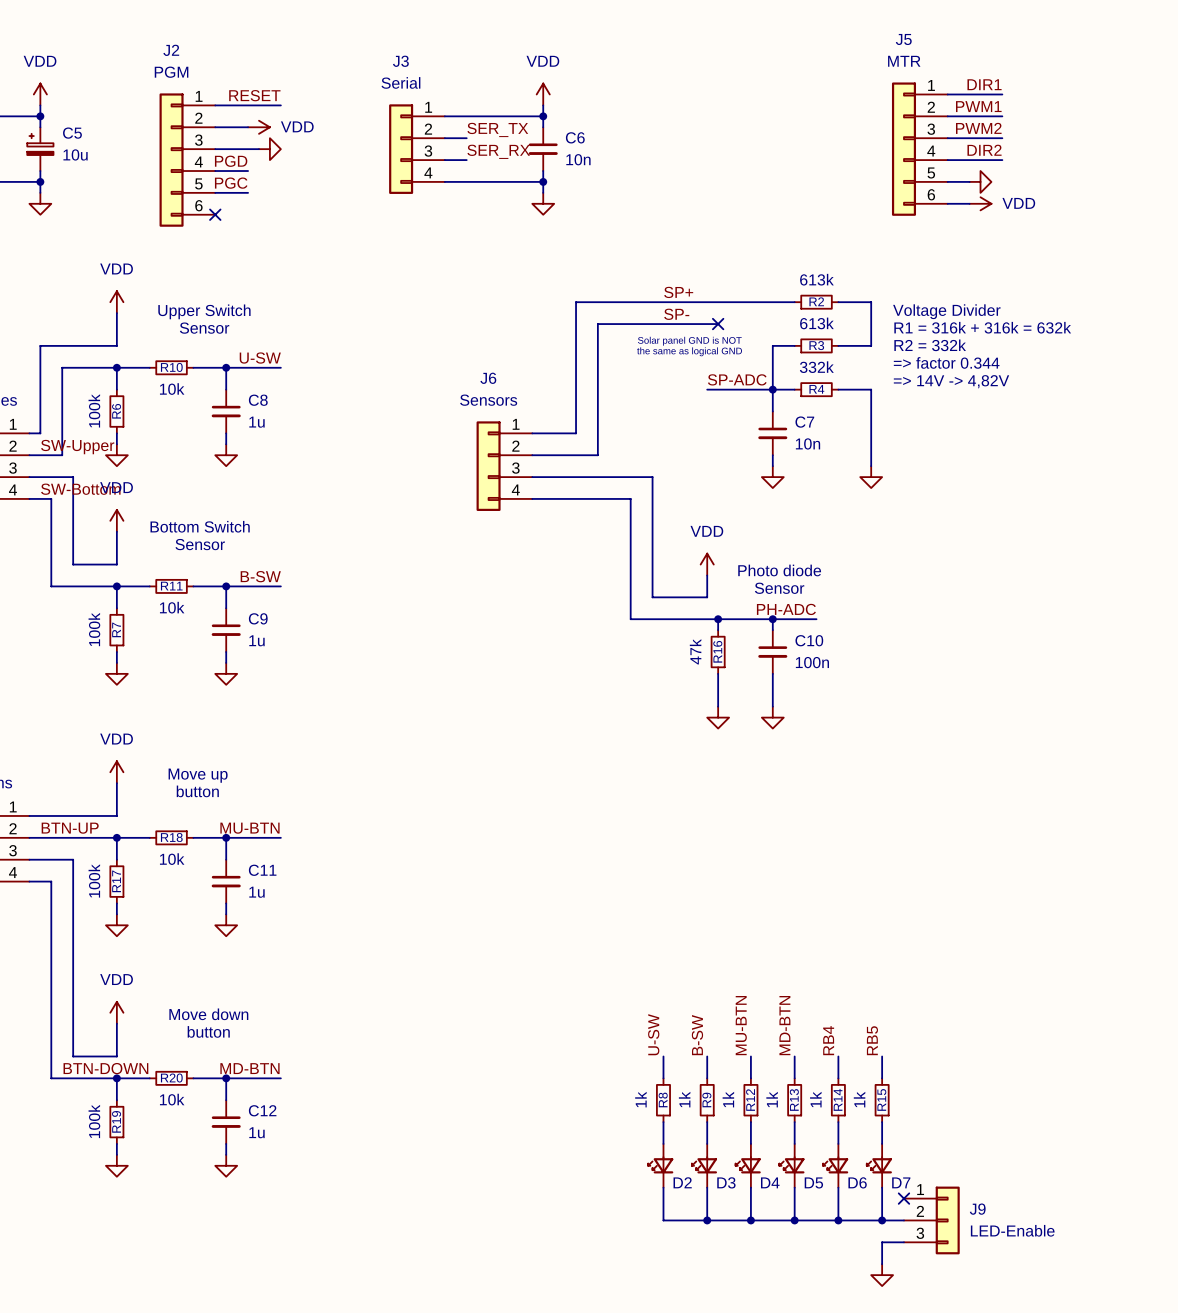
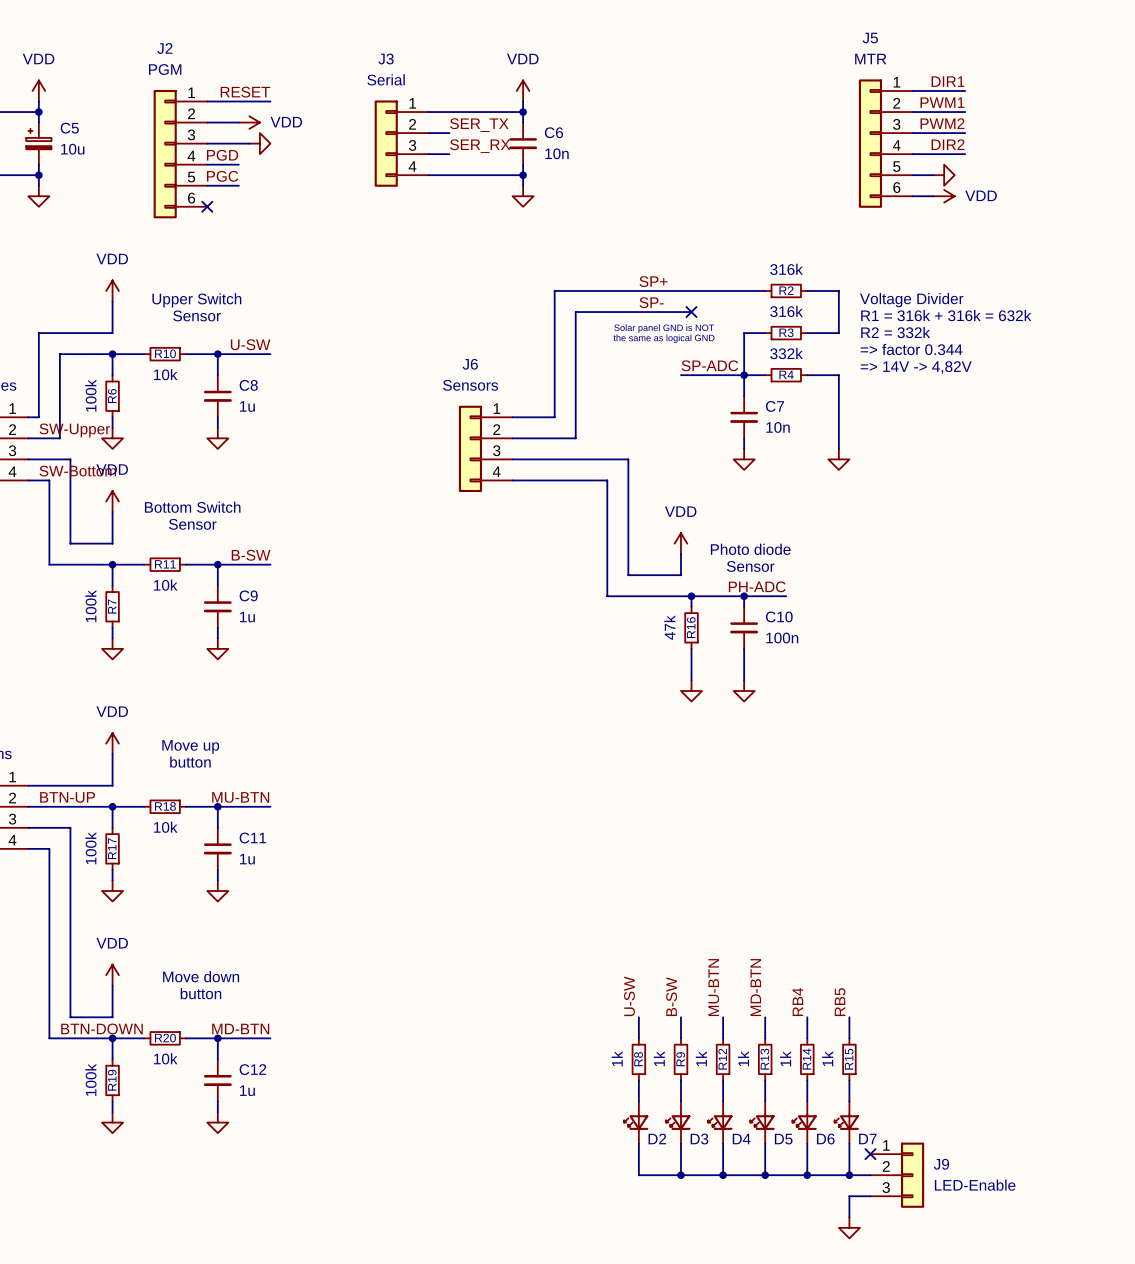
R2 value: 613k (816, 279) -> 316k (786, 269)
R3 value: 613k (816, 323) -> 316k (786, 311)

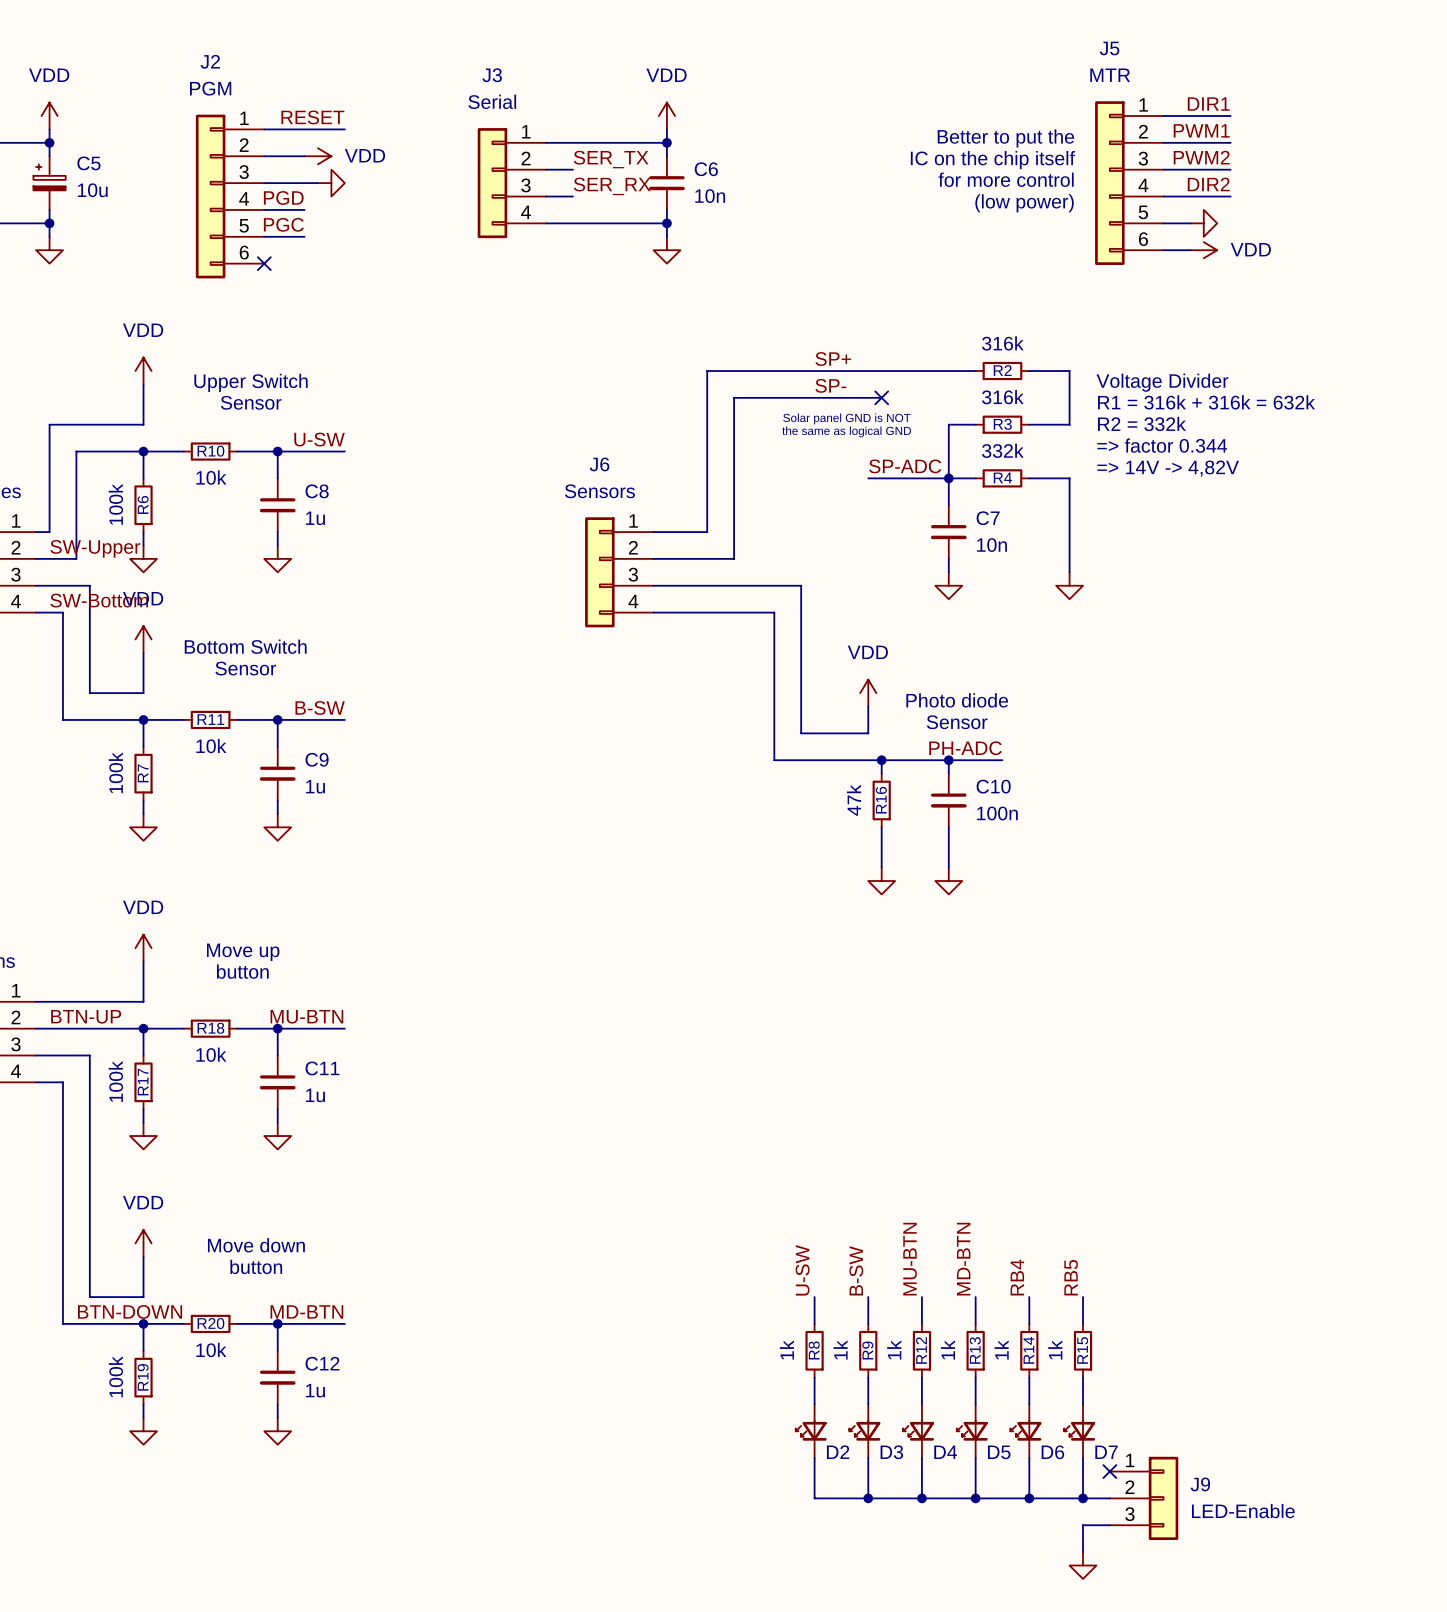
text: none -> Better to put the (1005, 138)
text: none -> IC on the chip itself (992, 160)
text: none -> for more control (1006, 179)
text: none -> (low power) (1024, 203)

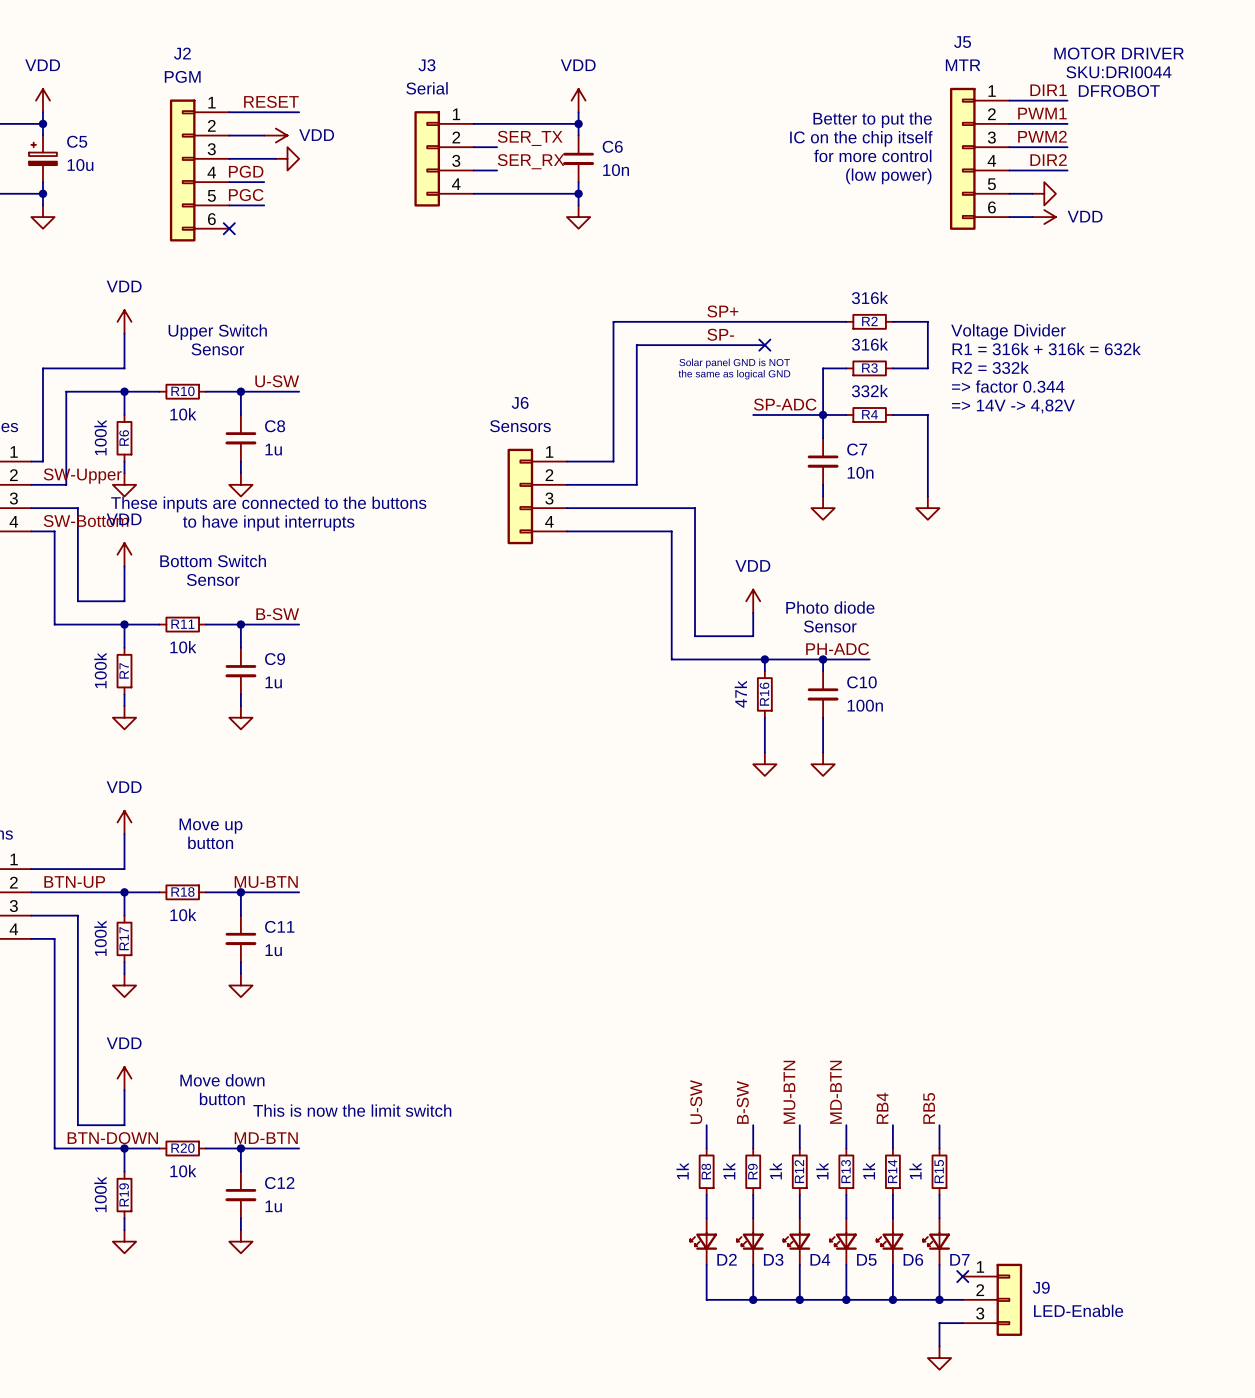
text: none -> MOTOR DRIVER (1119, 53)
text: none -> SKU:DRI0044 (1118, 72)
text: none -> DFROBOT (1119, 91)
text: none -> These inputs are connected to the buttons (268, 504)
text: none -> to have input interrupts (268, 523)
text: none -> This is now the limit switch (352, 1110)

